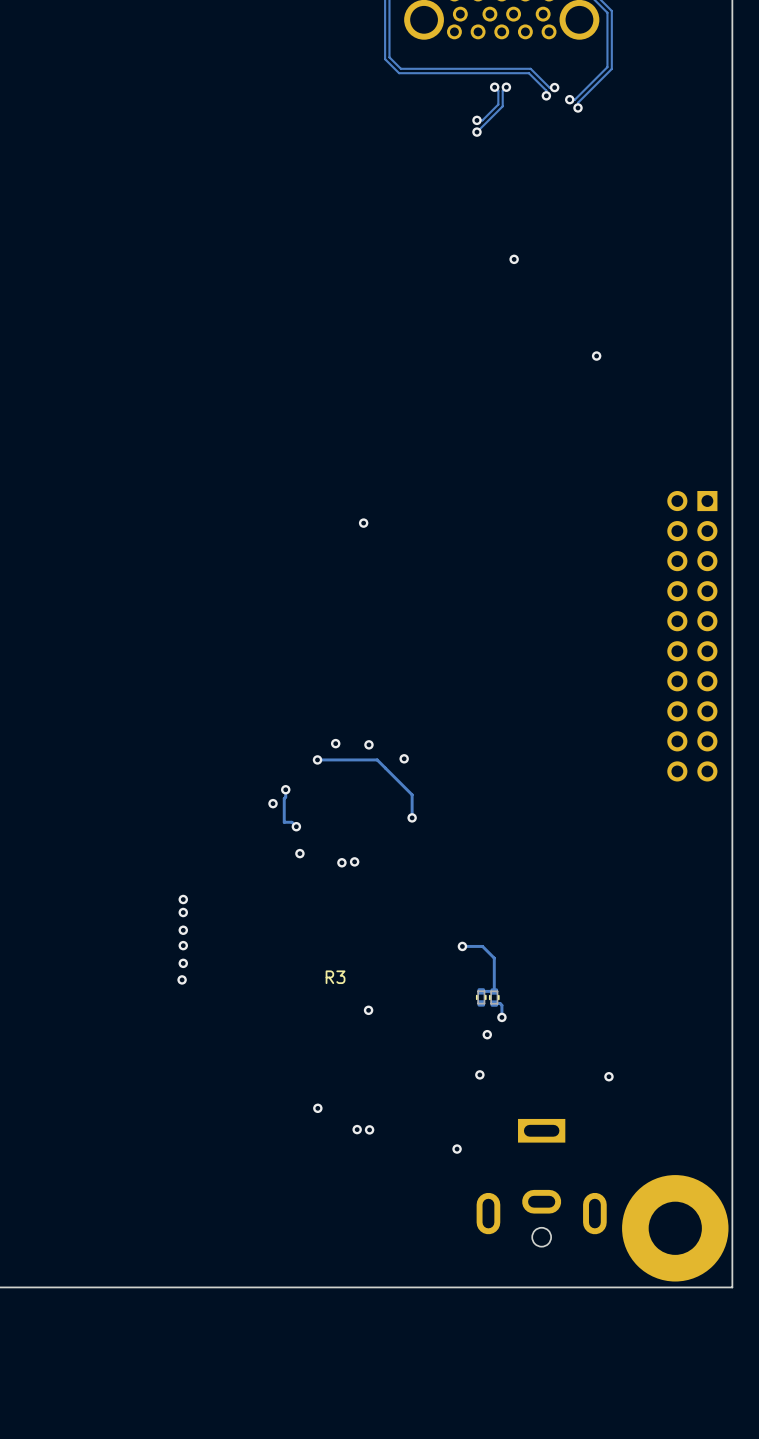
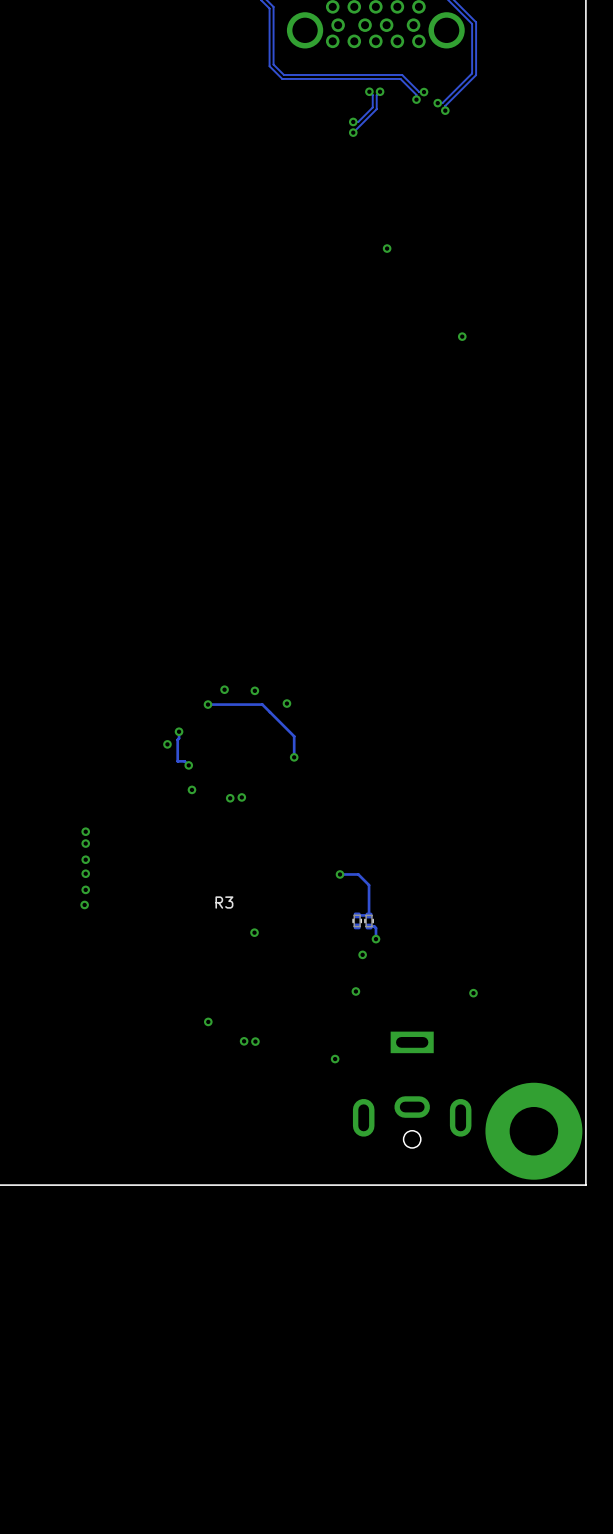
via: (363, 523) -> none
part: (692, 636) -> none

